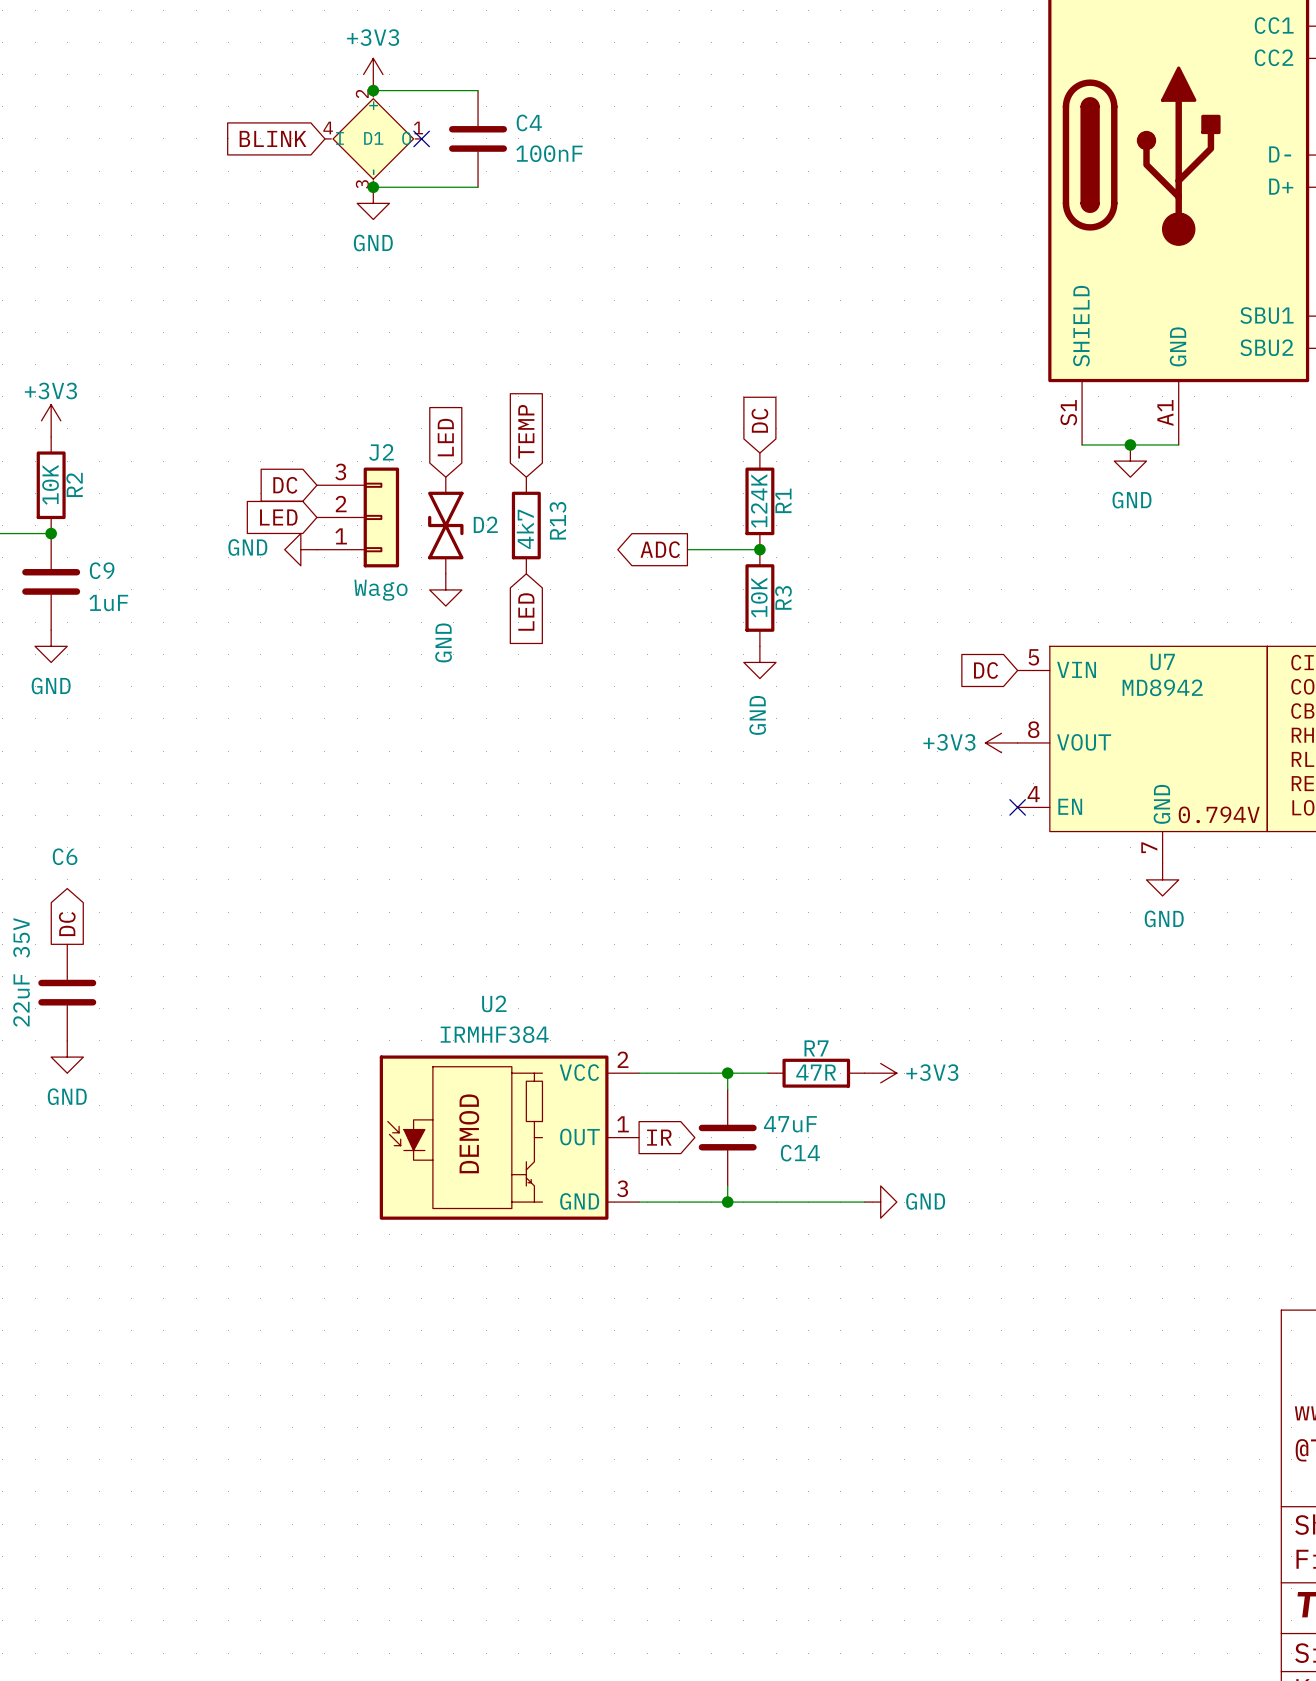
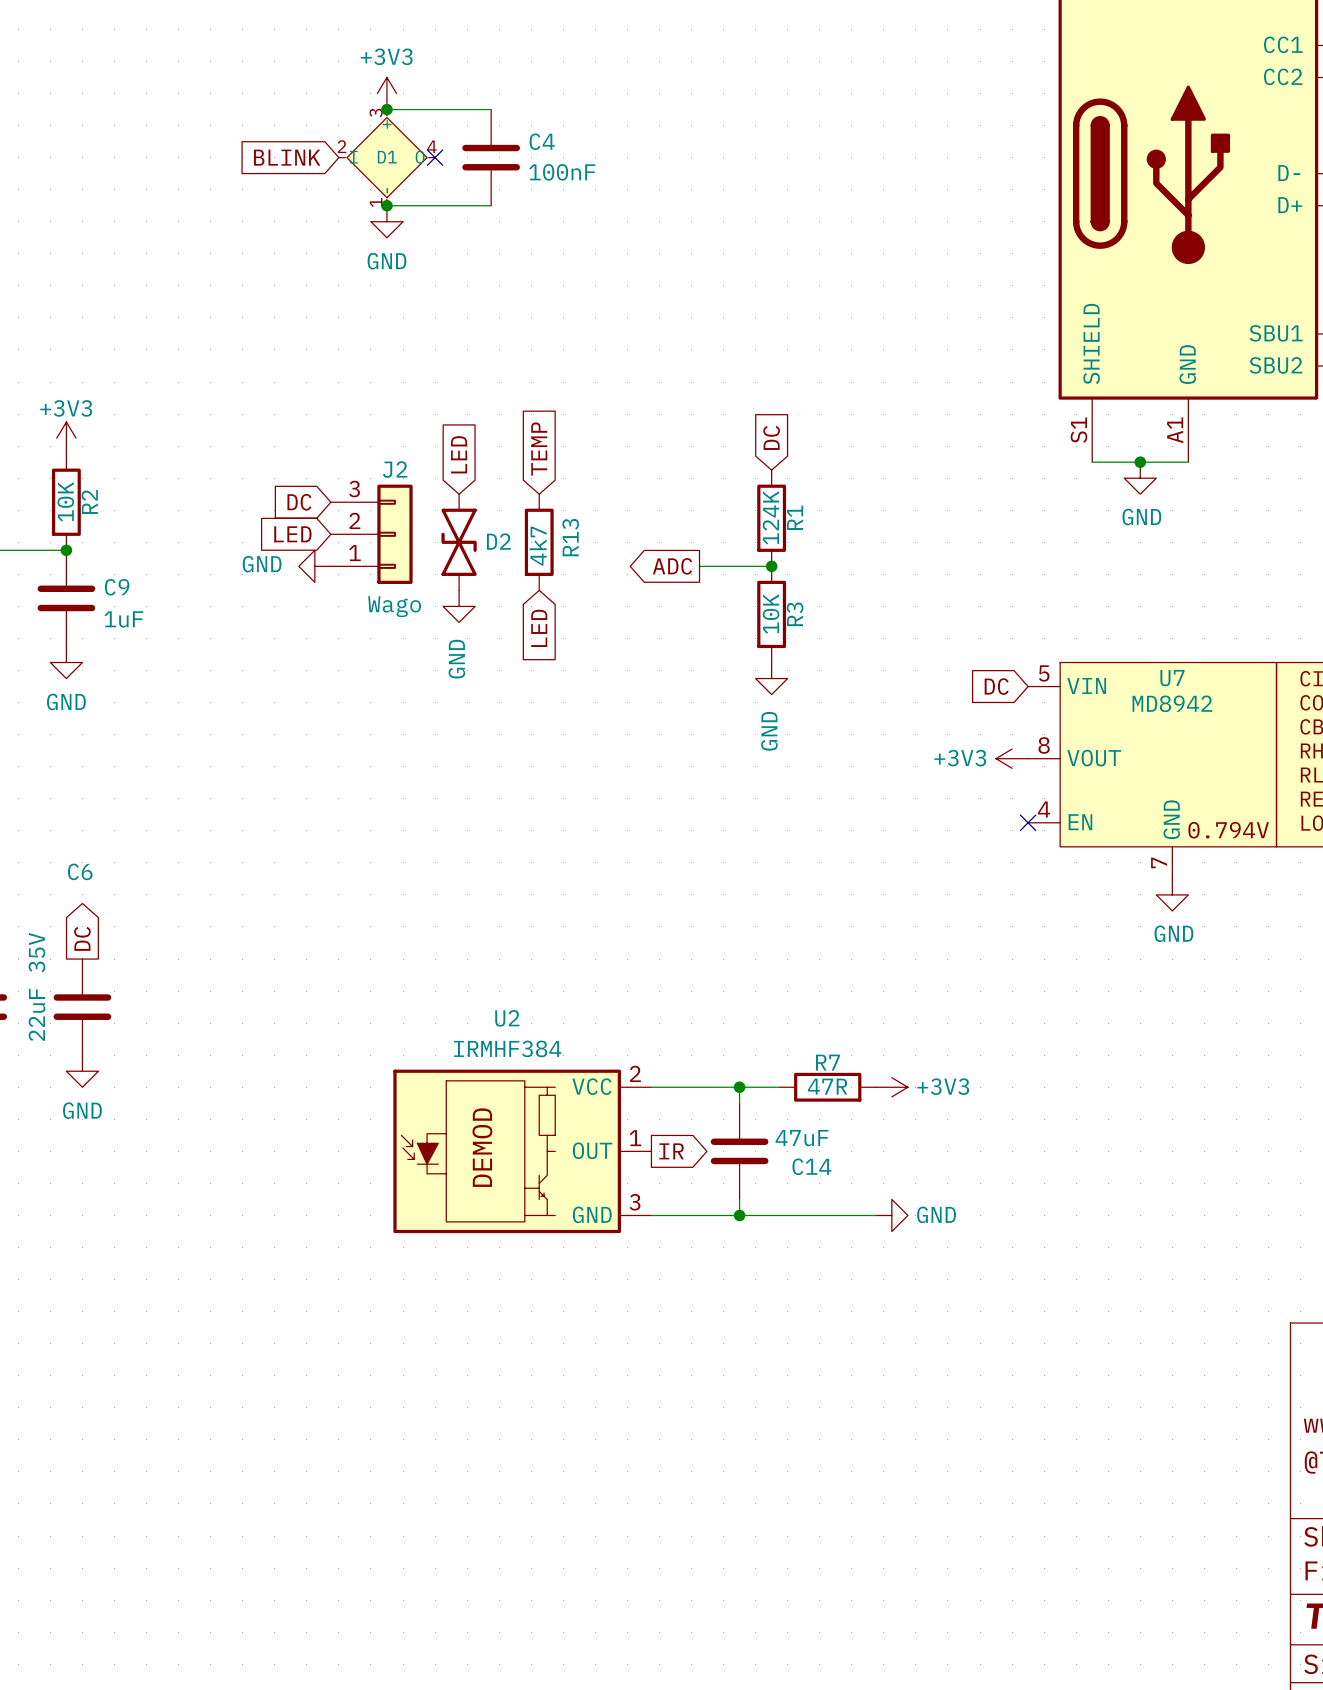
D1 pin number: 2 (362, 93) -> 3 (376, 113)
D1 pin number: 4 (328, 127) -> 2 (342, 146)
D1 pin number: 1 (418, 127) -> 4 (431, 146)
D1 pin number: 3 (362, 184) -> 1 (376, 202)

